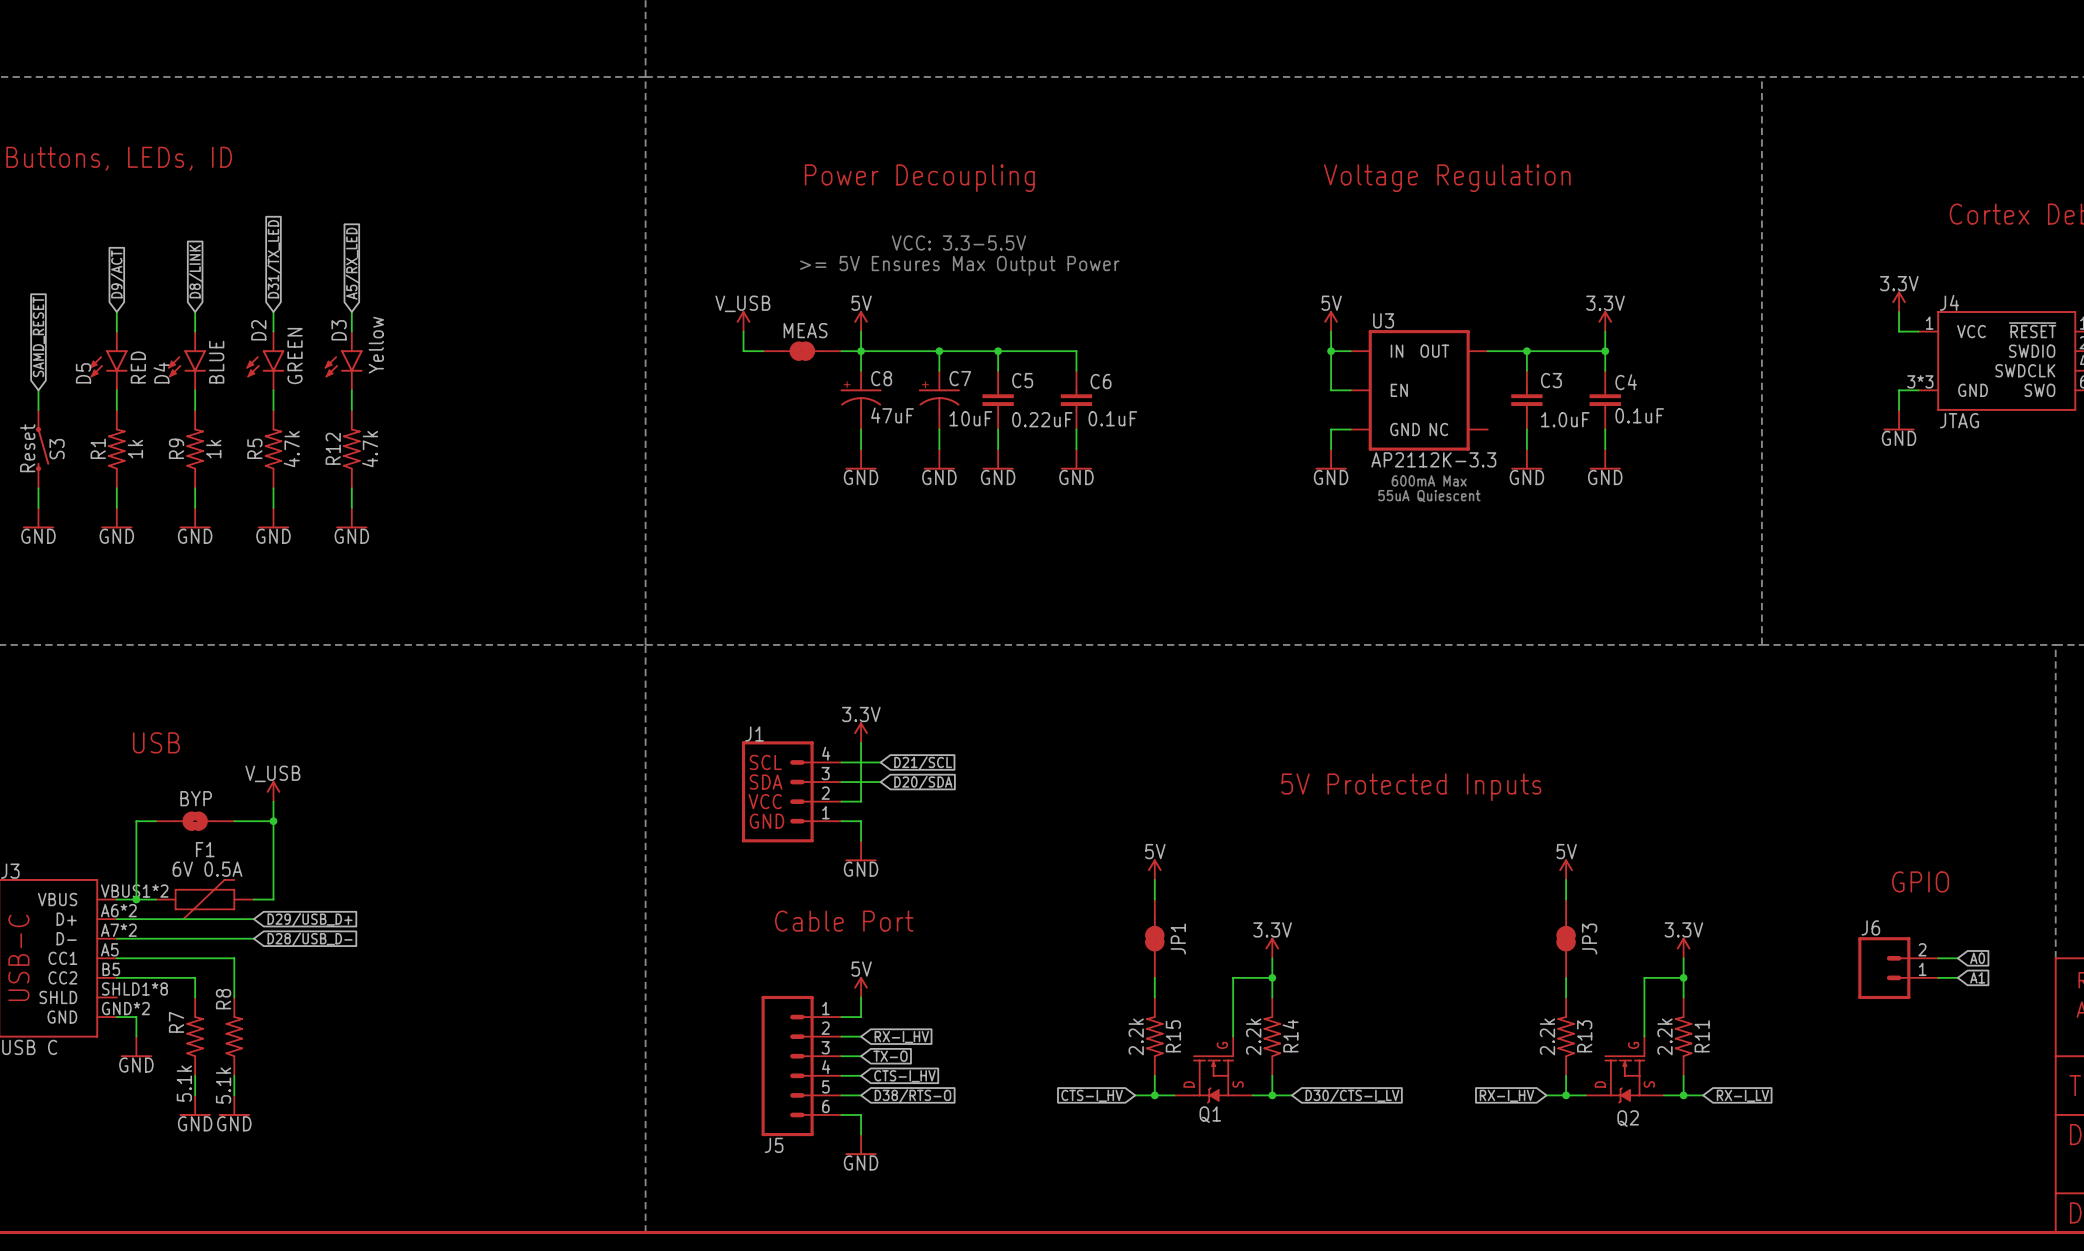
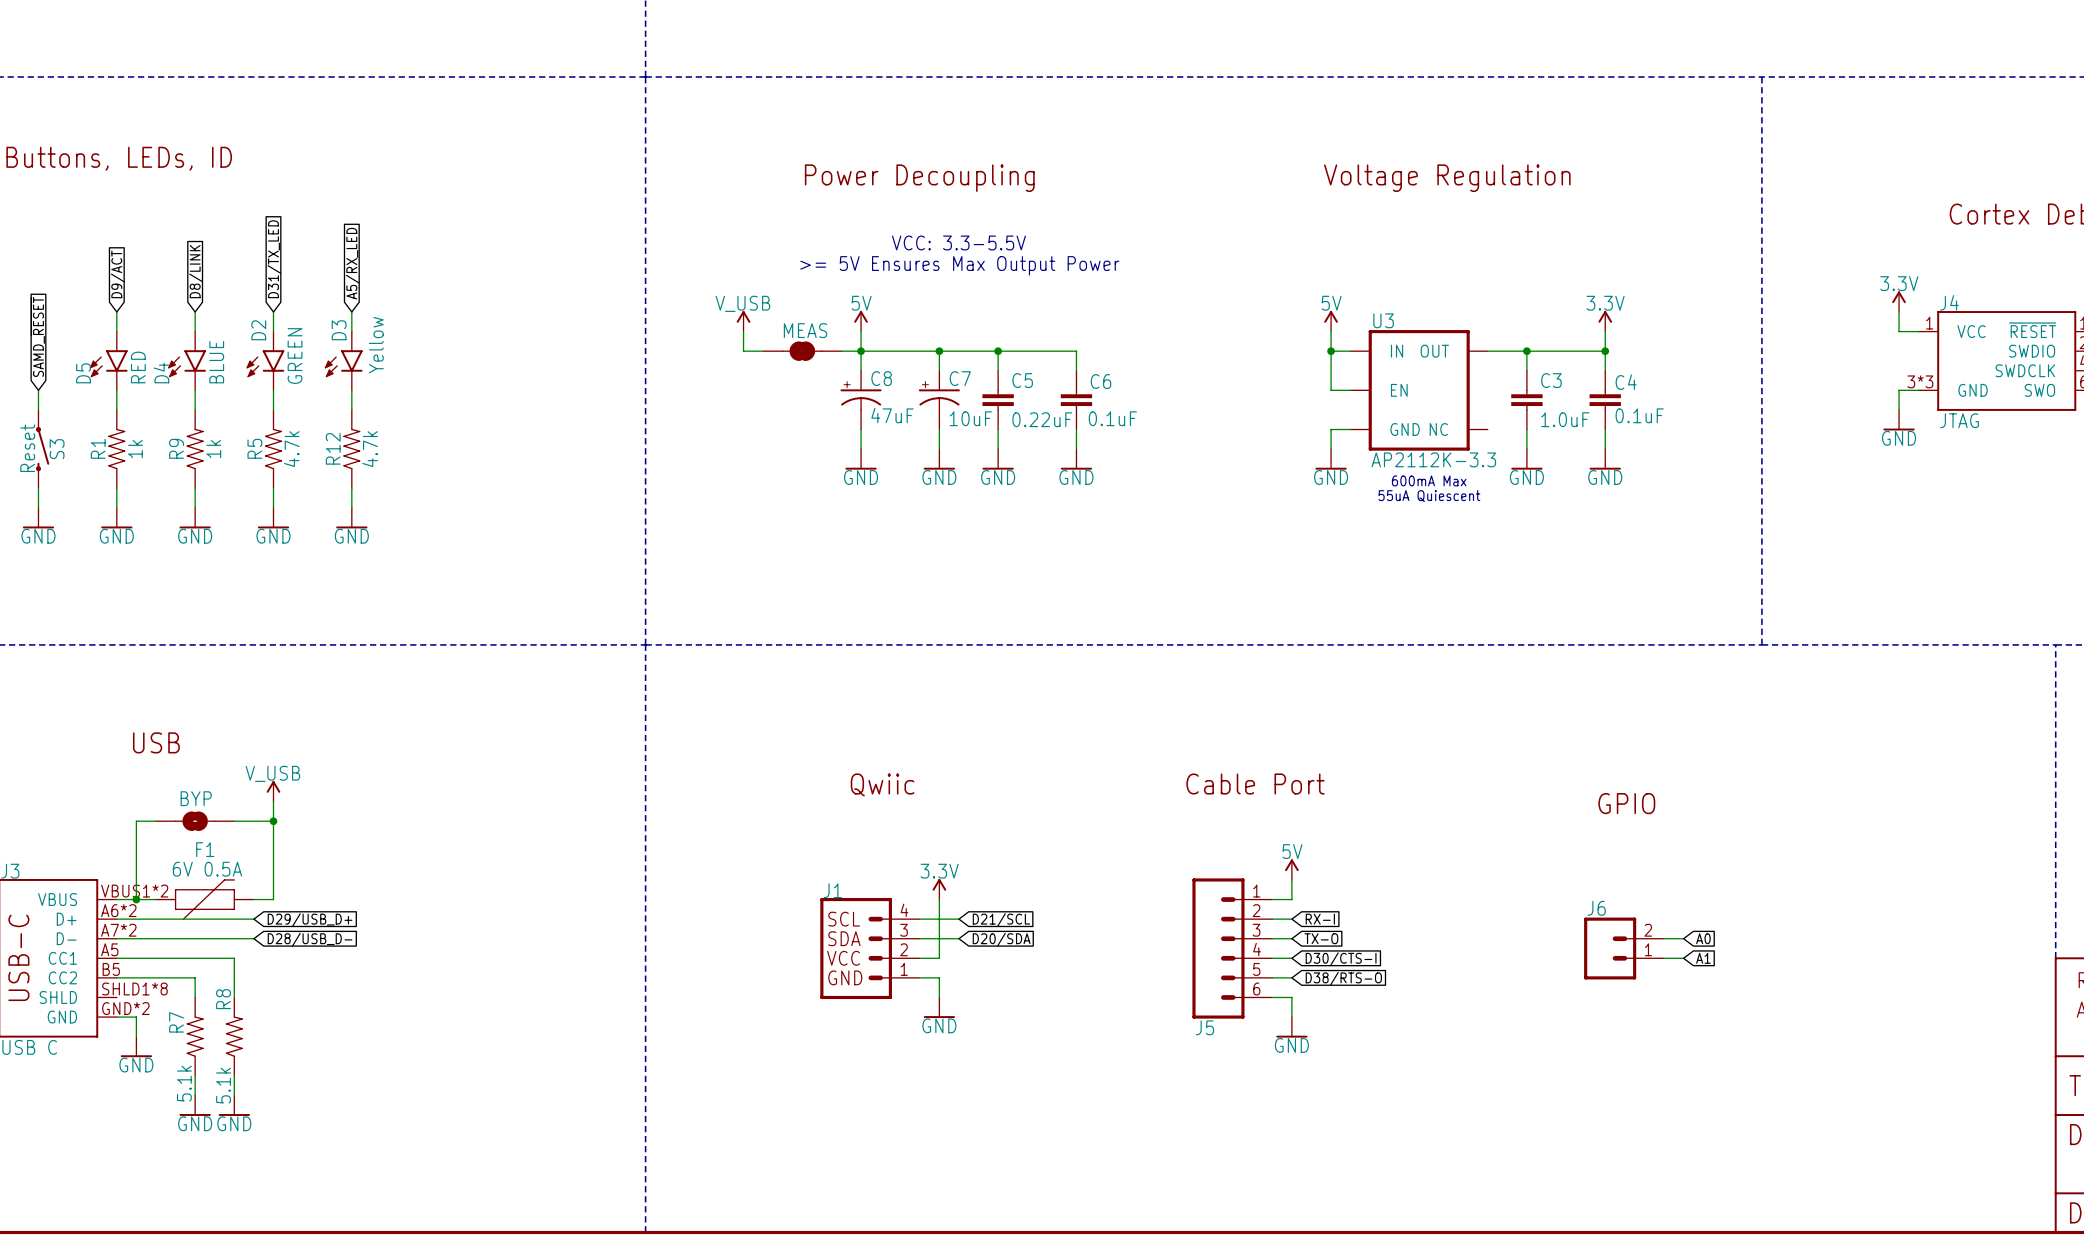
power symbol: 3.3V (861, 732) -> none
wire: (861, 742) (861, 801) (841, 801) -> (939, 899) (939, 958) (919, 958)
wire: (841, 762) (880, 762) -> (919, 919) (958, 919)
global label position: D21/SCL (923, 763) -> D21/SCL (1001, 920)
wire: (841, 782) (880, 782) -> (919, 938) (958, 938)
global label position: D20/SDA (923, 782) -> D20/SDA (1001, 939)
text: none -> Qwiic (882, 784)
text: none -> Cable Port (1255, 784)
text: 5V Protected Inputs (1411, 787) -> none
J1 position: (791, 791) -> (870, 948)
text: none -> GPIO (1626, 803)
wire: (841, 821) (861, 821) (861, 840) -> (919, 977) (939, 977) (939, 997)
power symbol: GND (861, 851) -> none
power symbol: 5V (1154, 869) -> none
power symbol: none -> 5V (1291, 869)
power symbol: 5V (1566, 869) -> none
wire: (1154, 879) (1154, 899) -> none
wire: none -> (1291, 879) (1291, 899) (1272, 899)
wire: (1566, 879) (1566, 899) -> none
text: GPIO (1920, 881) -> none
power symbol: none -> 3.3V (939, 889)
wire: none -> (1272, 919) (1291, 919)
global label: none -> RX-I (1320, 919)
text: Cable Port (844, 921) -> none
JP1: (1154, 938) -> none
wire: none -> (1272, 938) (1291, 938)
global label: none -> TX-O (1321, 938)
JP3: (1566, 938) -> none
wire: none -> (1664, 938) (1683, 938)
global label: none -> A0 (1703, 938)
power symbol: 3.3V (1272, 948) -> none
power symbol: 3.3V (1683, 948) -> none
wire: (1272, 958) (1272, 997) -> (1272, 958) (1291, 958)
wire: (1683, 958) (1683, 997) -> (1683, 958) (1664, 958)
global label: none -> A1 (1703, 958)
wire: (1938, 958) (1957, 958) -> none
global label: A0 (1977, 958) -> none
global label: none -> D30/CTS-I (1341, 959)
J6 position: (1898, 968) -> (1624, 948)
wire: (1154, 977) (1154, 997) -> none
wire: (1272, 977) (1233, 977) (1233, 1036) -> (1272, 977) (1291, 977)
junction: (1272, 977) -> none
wire: (1566, 977) (1566, 997) -> none
wire: (1683, 977) (1644, 977) (1644, 1036) -> none
junction: (1683, 977) -> none
wire: (1938, 977) (1957, 977) -> none
global label: A1 (1977, 977) -> none
global label: none -> D38/RTS-O (1343, 978)
power symbol: 5V (861, 987) -> none
wire: (861, 997) (861, 1017) (841, 1017) -> none
wire: none -> (1272, 997) (1291, 997) (1291, 1017)
power symbol: none -> GND (939, 1007)
power symbol: none -> GND (1291, 1027)
wire: (841, 1036) (861, 1036) -> none
R15: 2.2k (1154, 1036) -> none
R14: 2.2k (1272, 1036) -> none
R13: 2.2k (1566, 1036) -> none
R11: 2.2k (1683, 1036) -> none
global label: RX-I_HV (901, 1037) -> none
wire: (841, 1056) (861, 1056) -> none
global label: TX-O (890, 1056) -> none
J5 position: (801, 1066) -> (1232, 948)
Q1: (1213, 1069) -> none
Q2: (1624, 1069) -> none
wire: (841, 1075) (861, 1075) -> none
wire: (1154, 1075) (1154, 1095) -> none
wire: (1272, 1075) (1272, 1095) -> none
wire: (1566, 1075) (1566, 1095) -> none
wire: (1683, 1075) (1683, 1095) -> none
global label: CTS-I_HV (904, 1076) -> none
wire: (841, 1095) (861, 1095) -> none
global label: CTS-I_HV (1092, 1095) -> none
wire: (1135, 1095) (1174, 1095) -> none
junction: (1154, 1095) -> none
wire: (1252, 1095) (1291, 1095) -> none
junction: (1272, 1095) -> none
global label: RX-I_HV (1506, 1095) -> none
wire: (1546, 1095) (1585, 1095) -> none
junction: (1566, 1095) -> none
wire: (1664, 1095) (1703, 1095) -> none
junction: (1683, 1095) -> none
global label: RX-I_LV (1742, 1095) -> none
global label: D38/RTS-O (912, 1096) -> none
global label: D30/CTS-I_LV (1352, 1096) -> none
wire: (841, 1114) (861, 1114) (861, 1134) -> none
power symbol: GND (861, 1144) -> none

